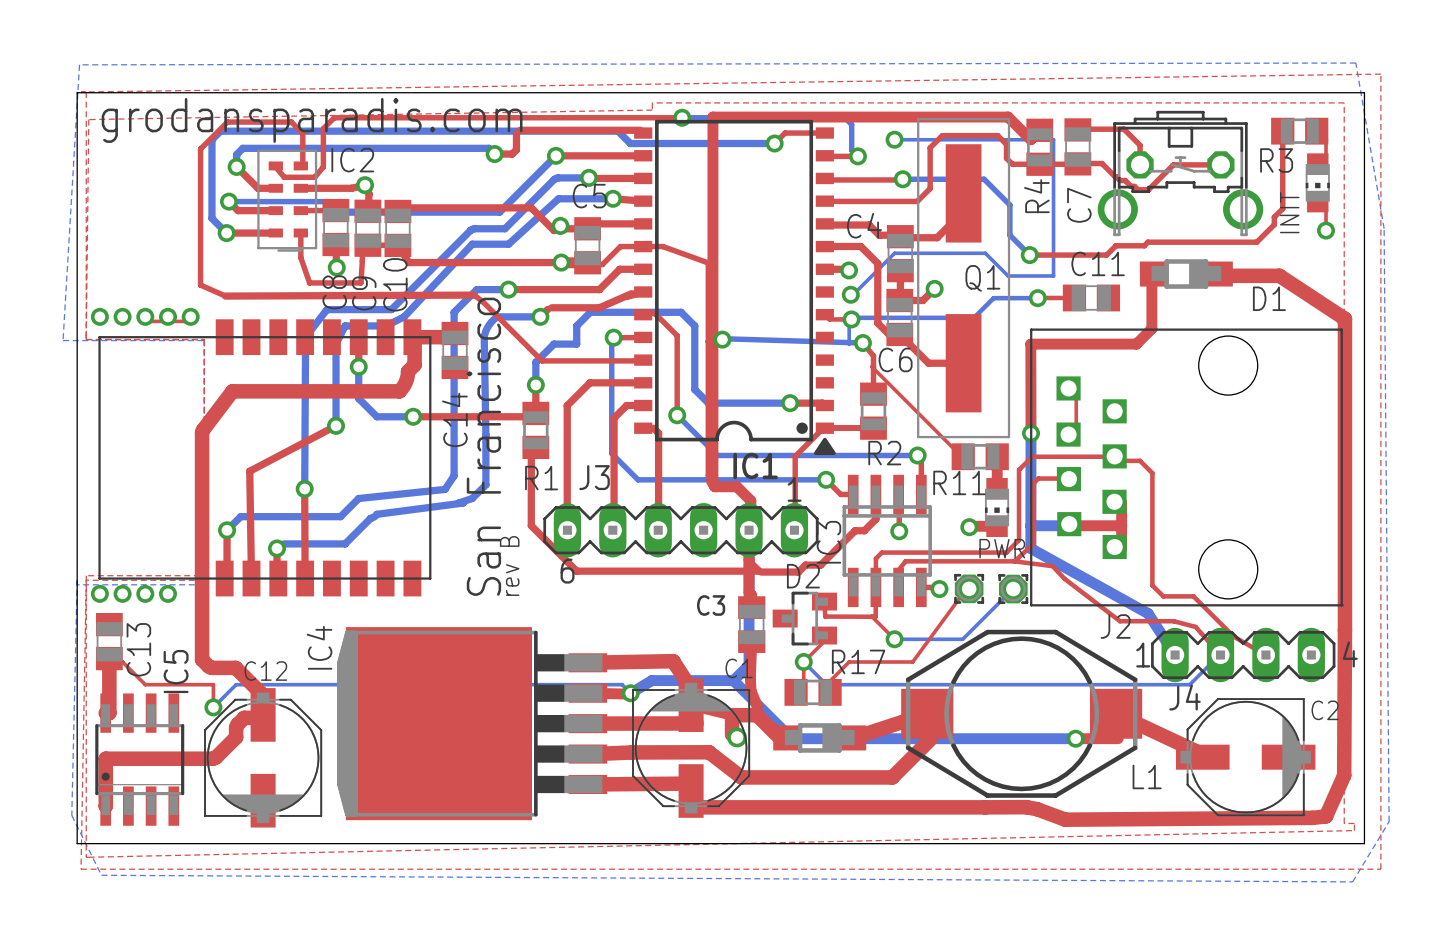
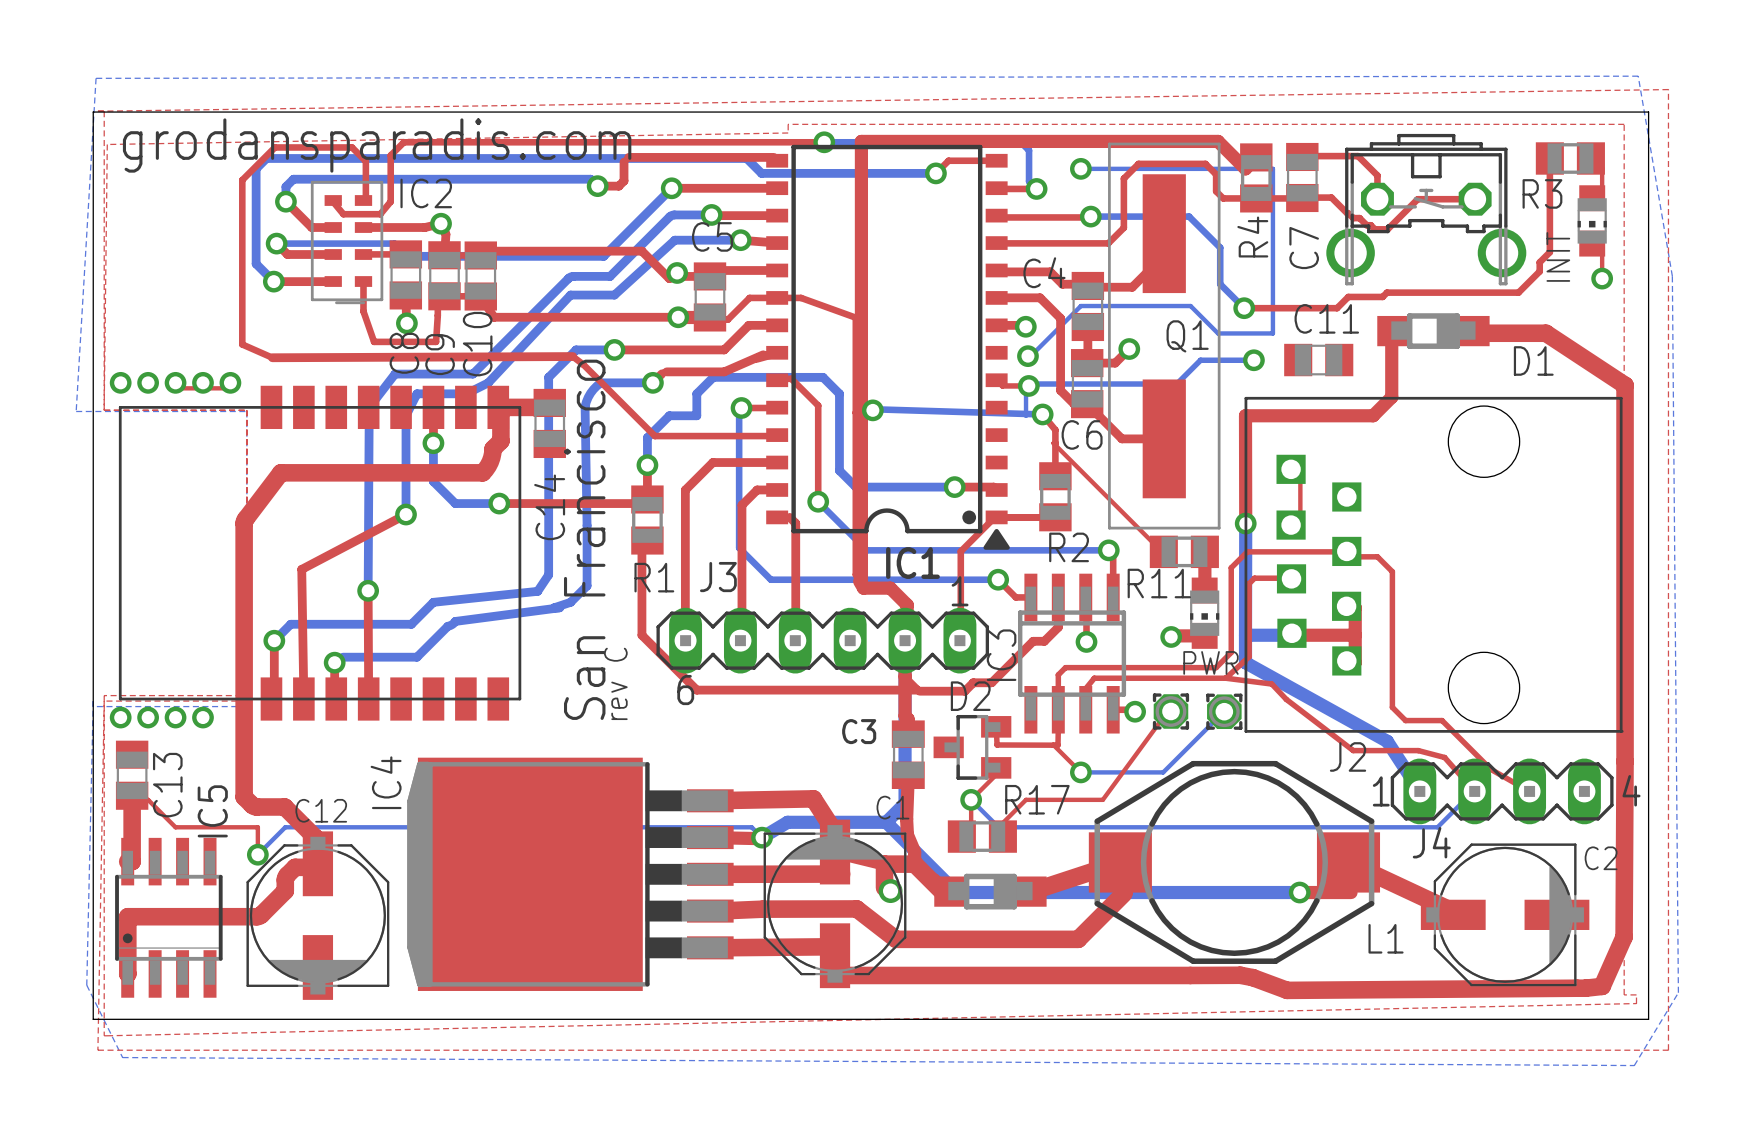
top track: (1037, 297) (1074, 297) -> none
text: rev B (509, 566) -> rev C (615, 683)

